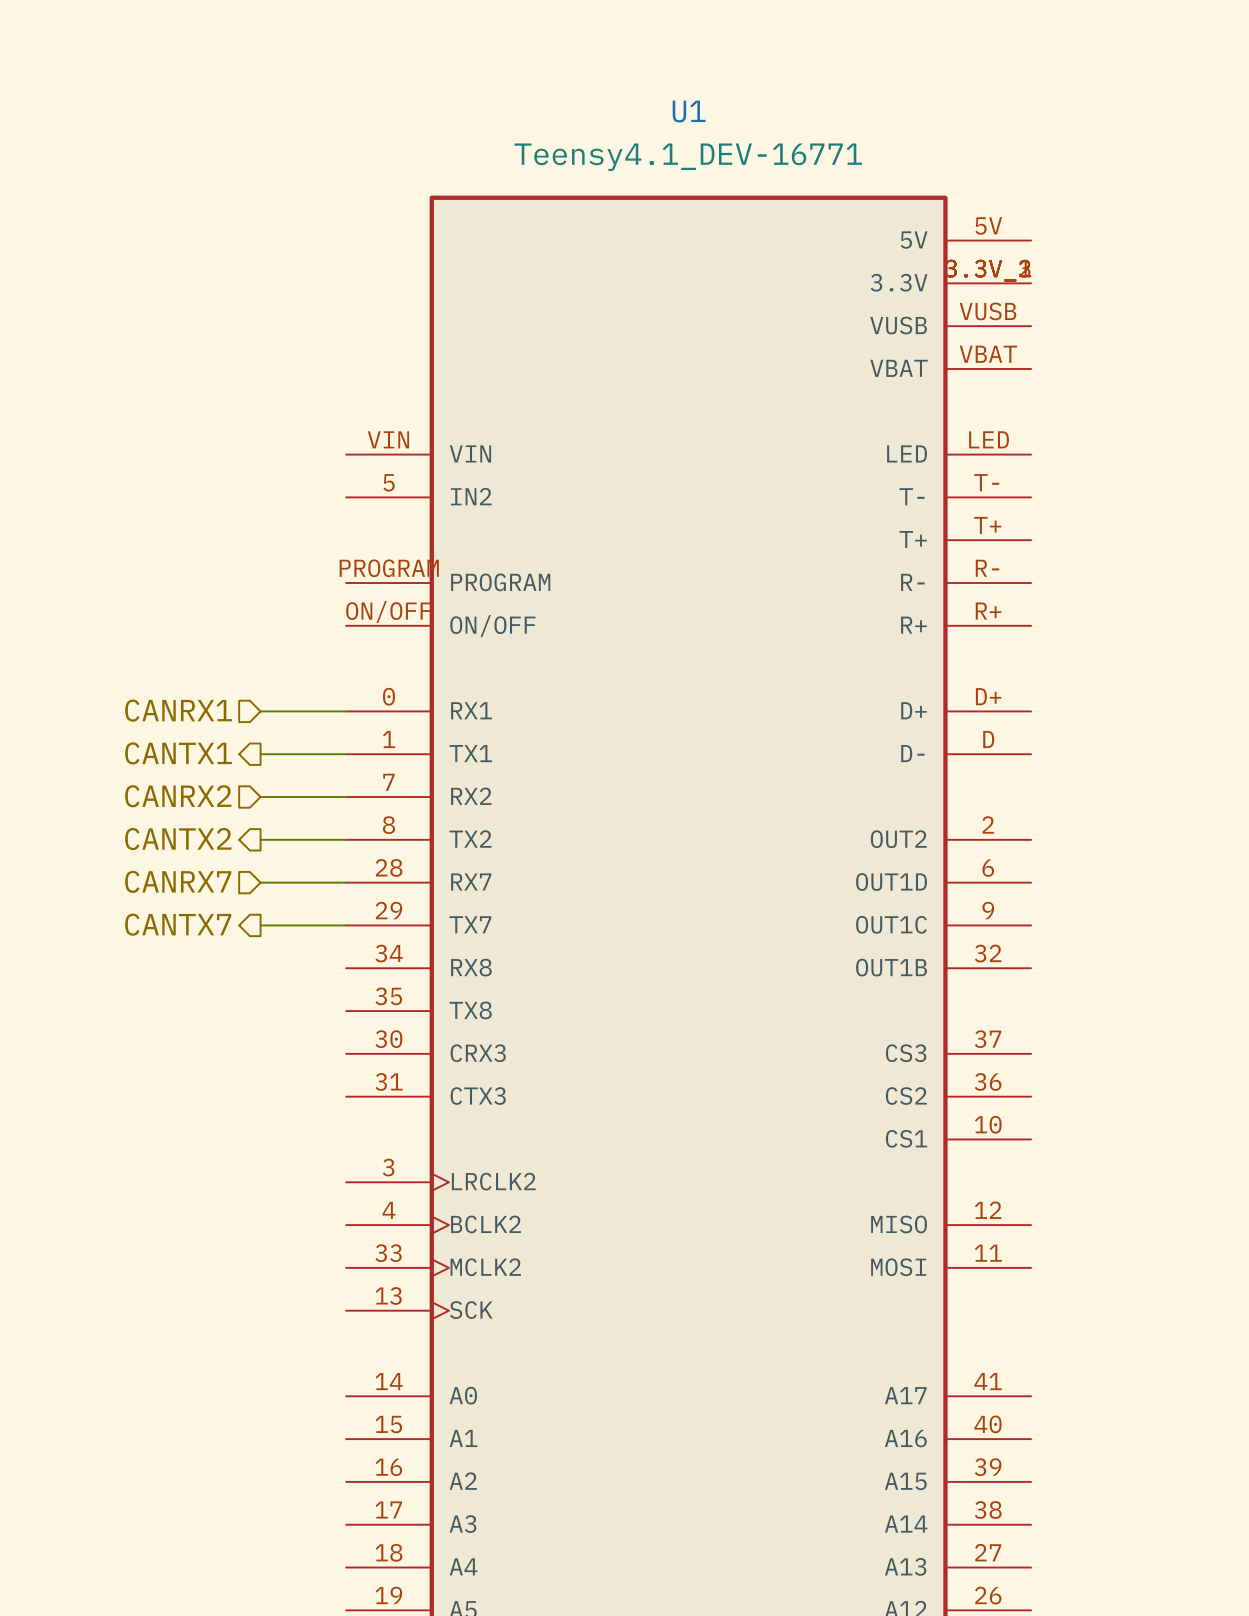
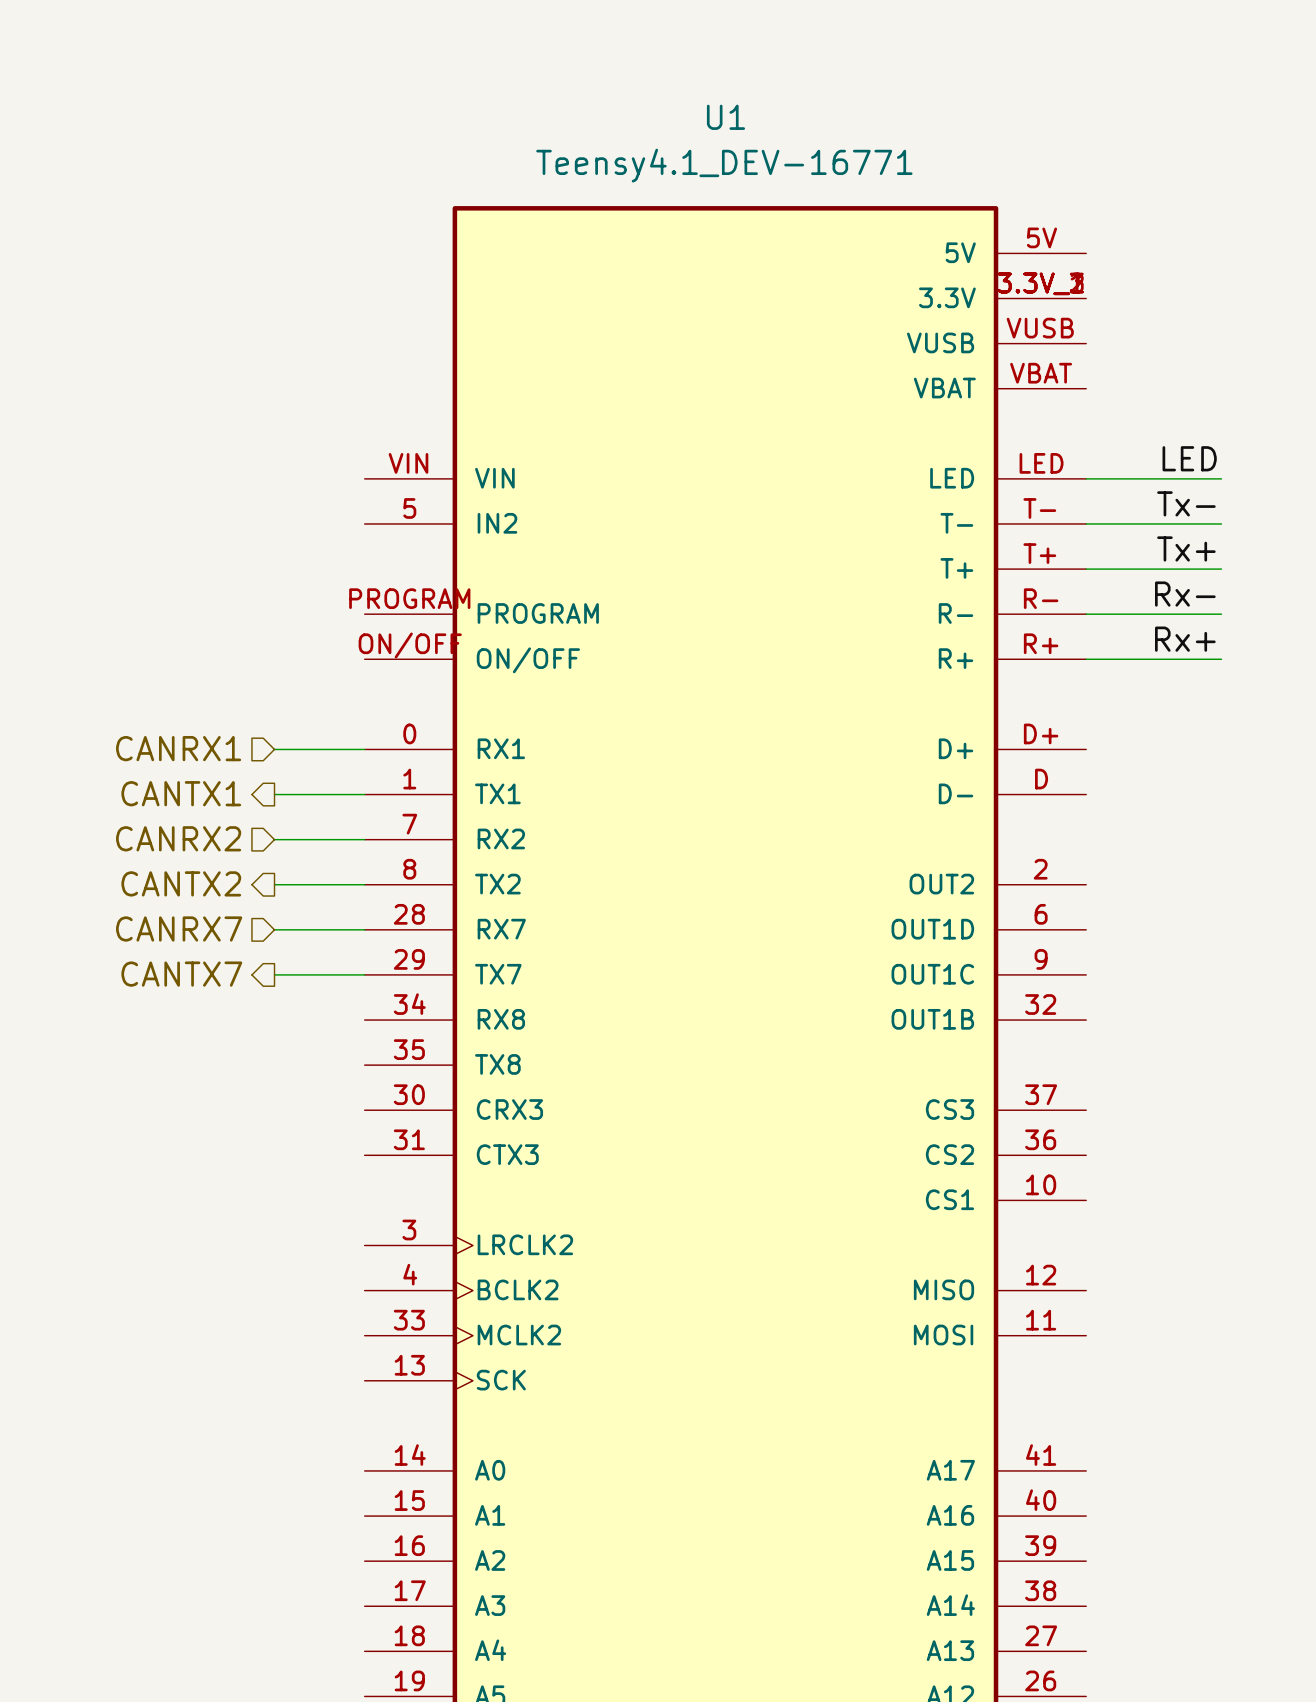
label: none -> LED (1189, 458)
wire: none -> (1086, 478) (1221, 478)
label: none -> Tx- (1186, 503)
wire: none -> (1086, 523) (1221, 523)
label: none -> Tx+ (1186, 548)
wire: none -> (1086, 569) (1221, 569)
label: none -> Rx- (1185, 594)
wire: none -> (1086, 614) (1221, 614)
label: none -> Rx+ (1185, 639)
wire: none -> (1086, 659) (1221, 659)

